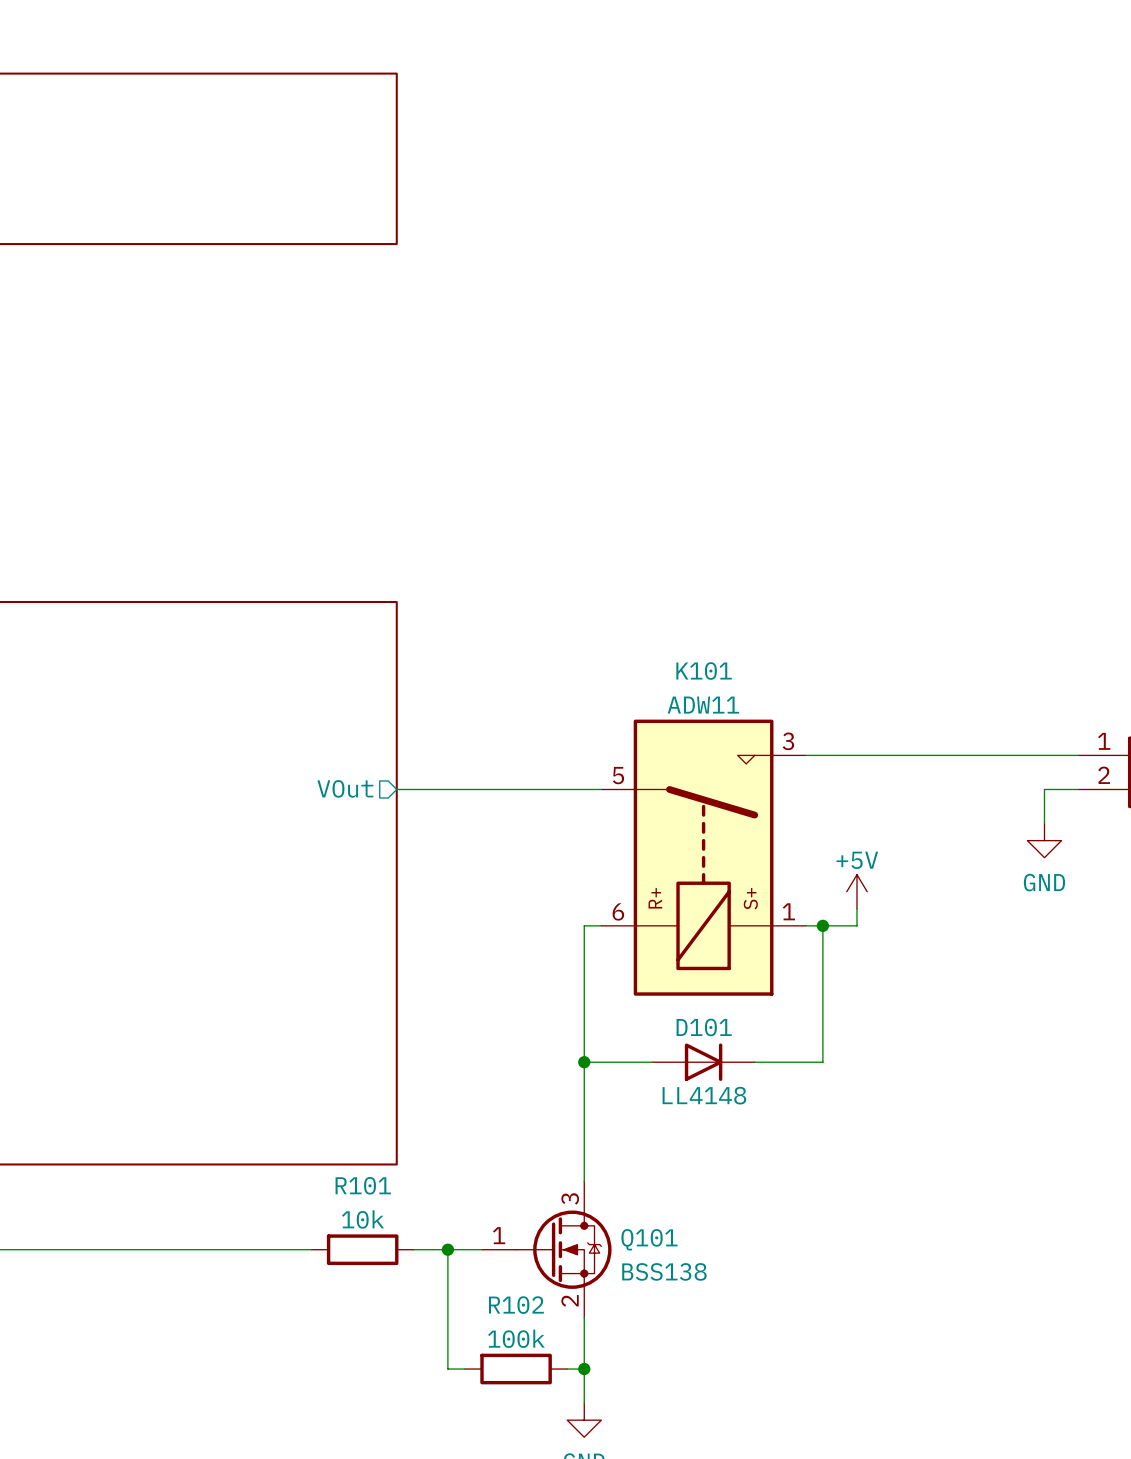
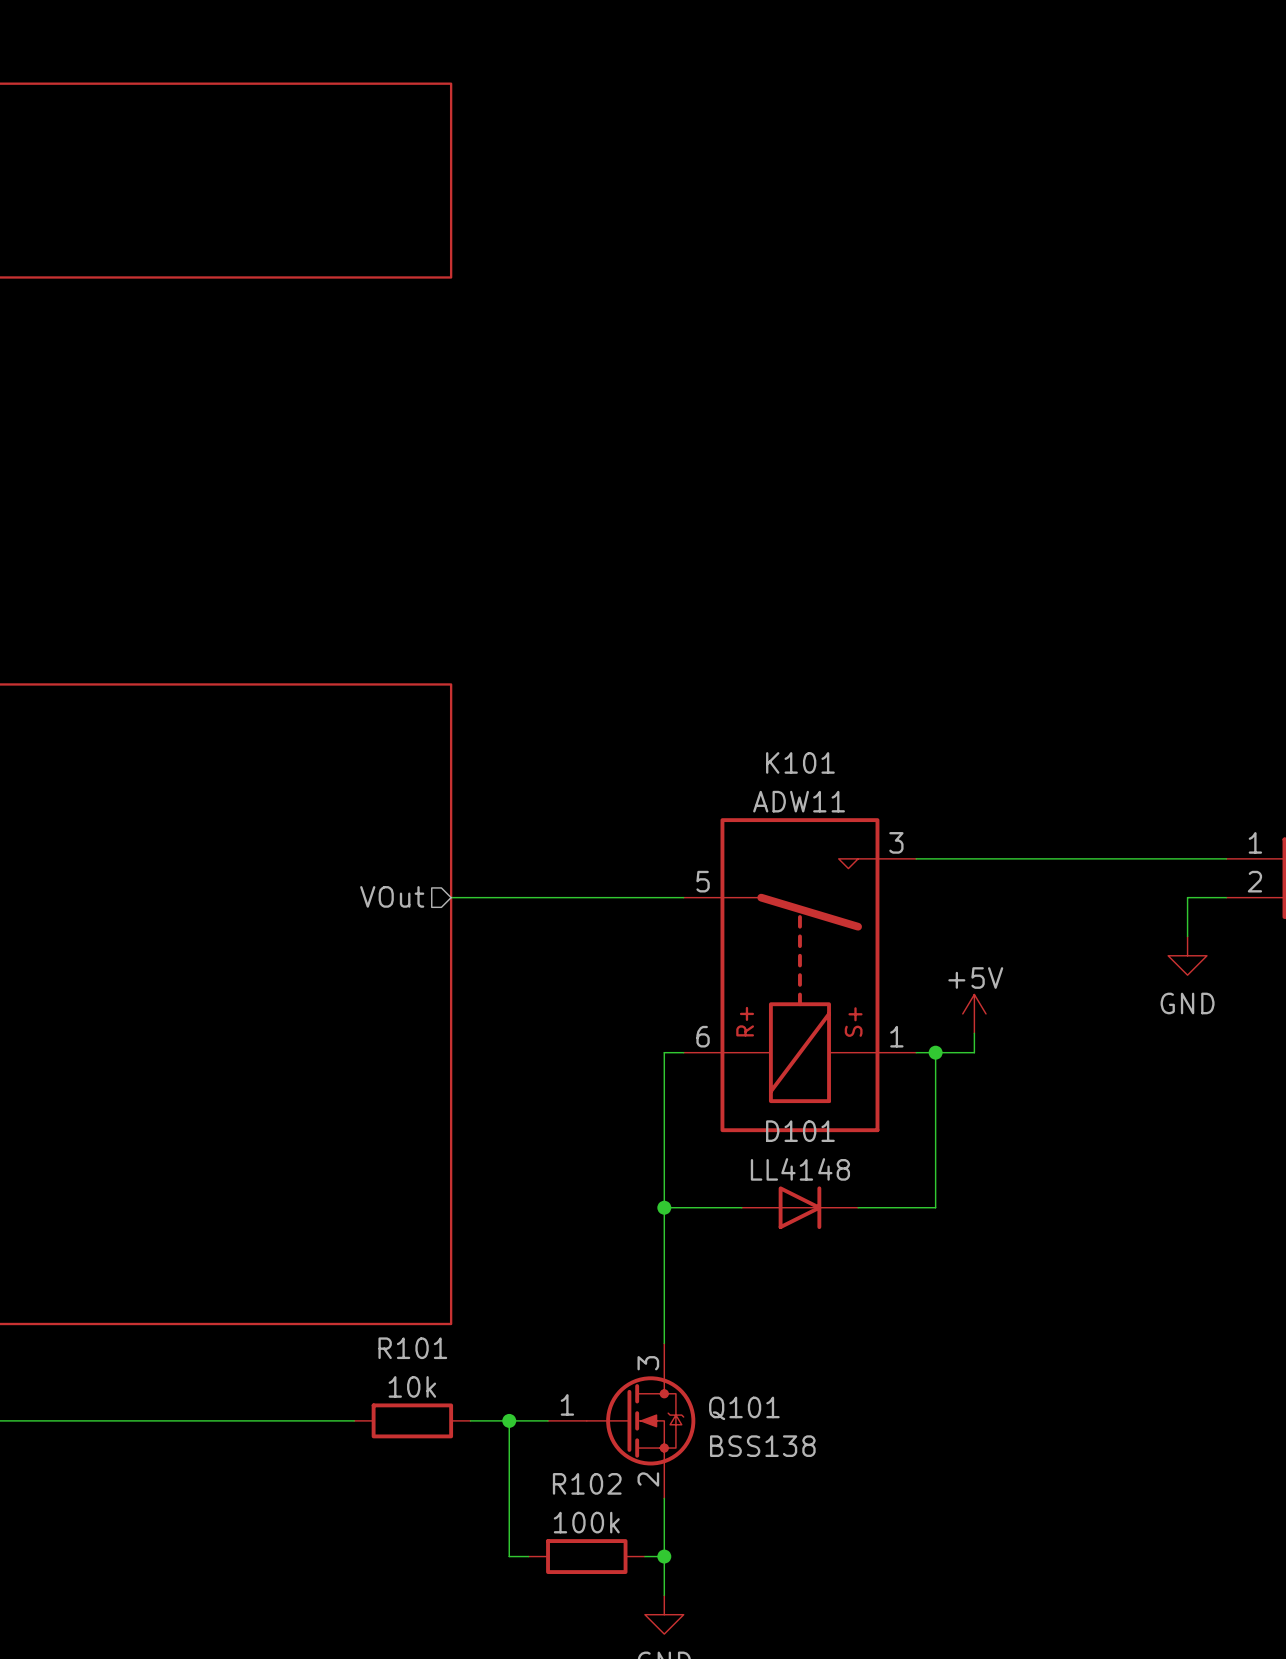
D101 name position: D101 (704, 1027) -> D101 (800, 1131)
D101 value position: LL4148 (704, 1095) -> LL4148 (800, 1169)

